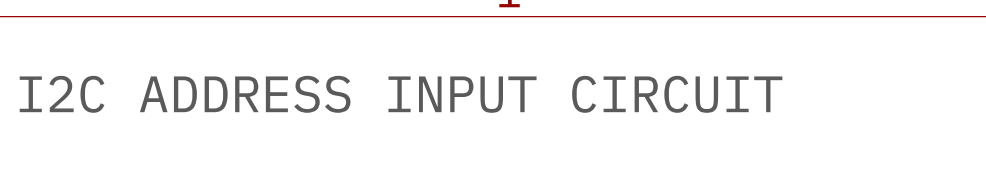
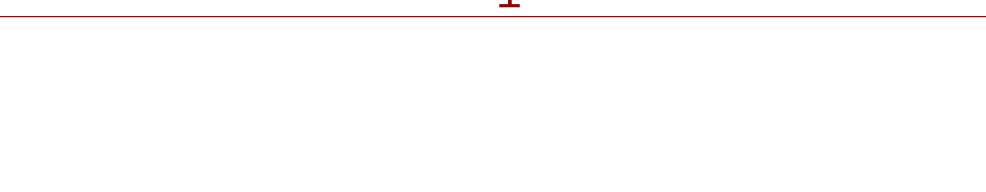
text: I2C ADDRESS INPUT CIRCUIT (401, 94) -> none

